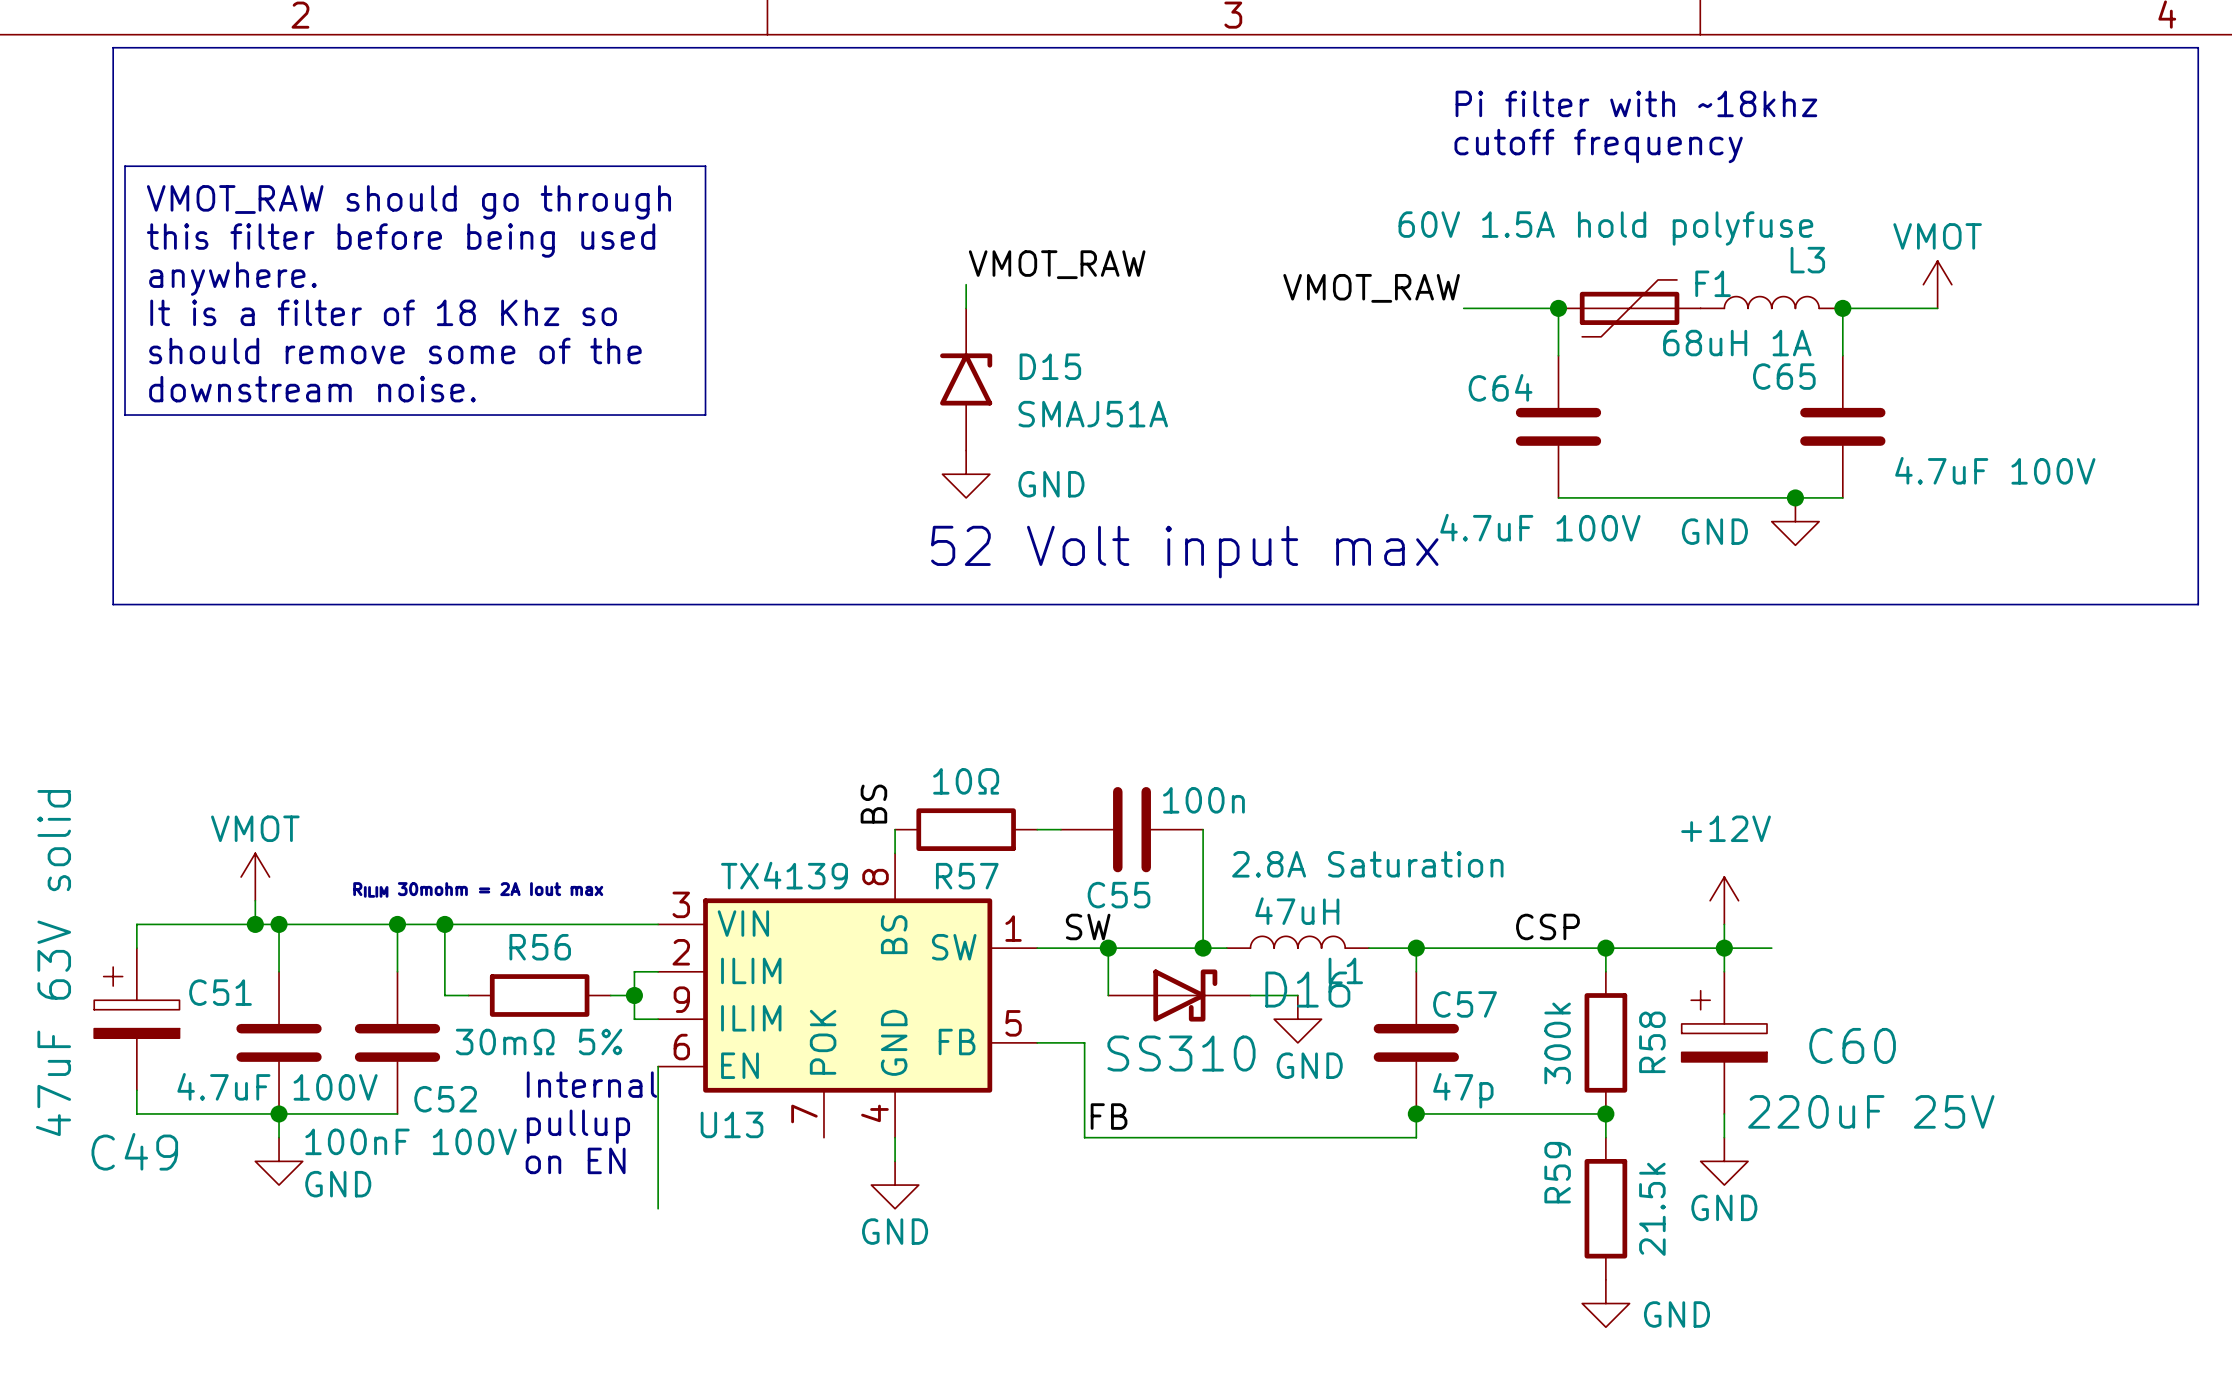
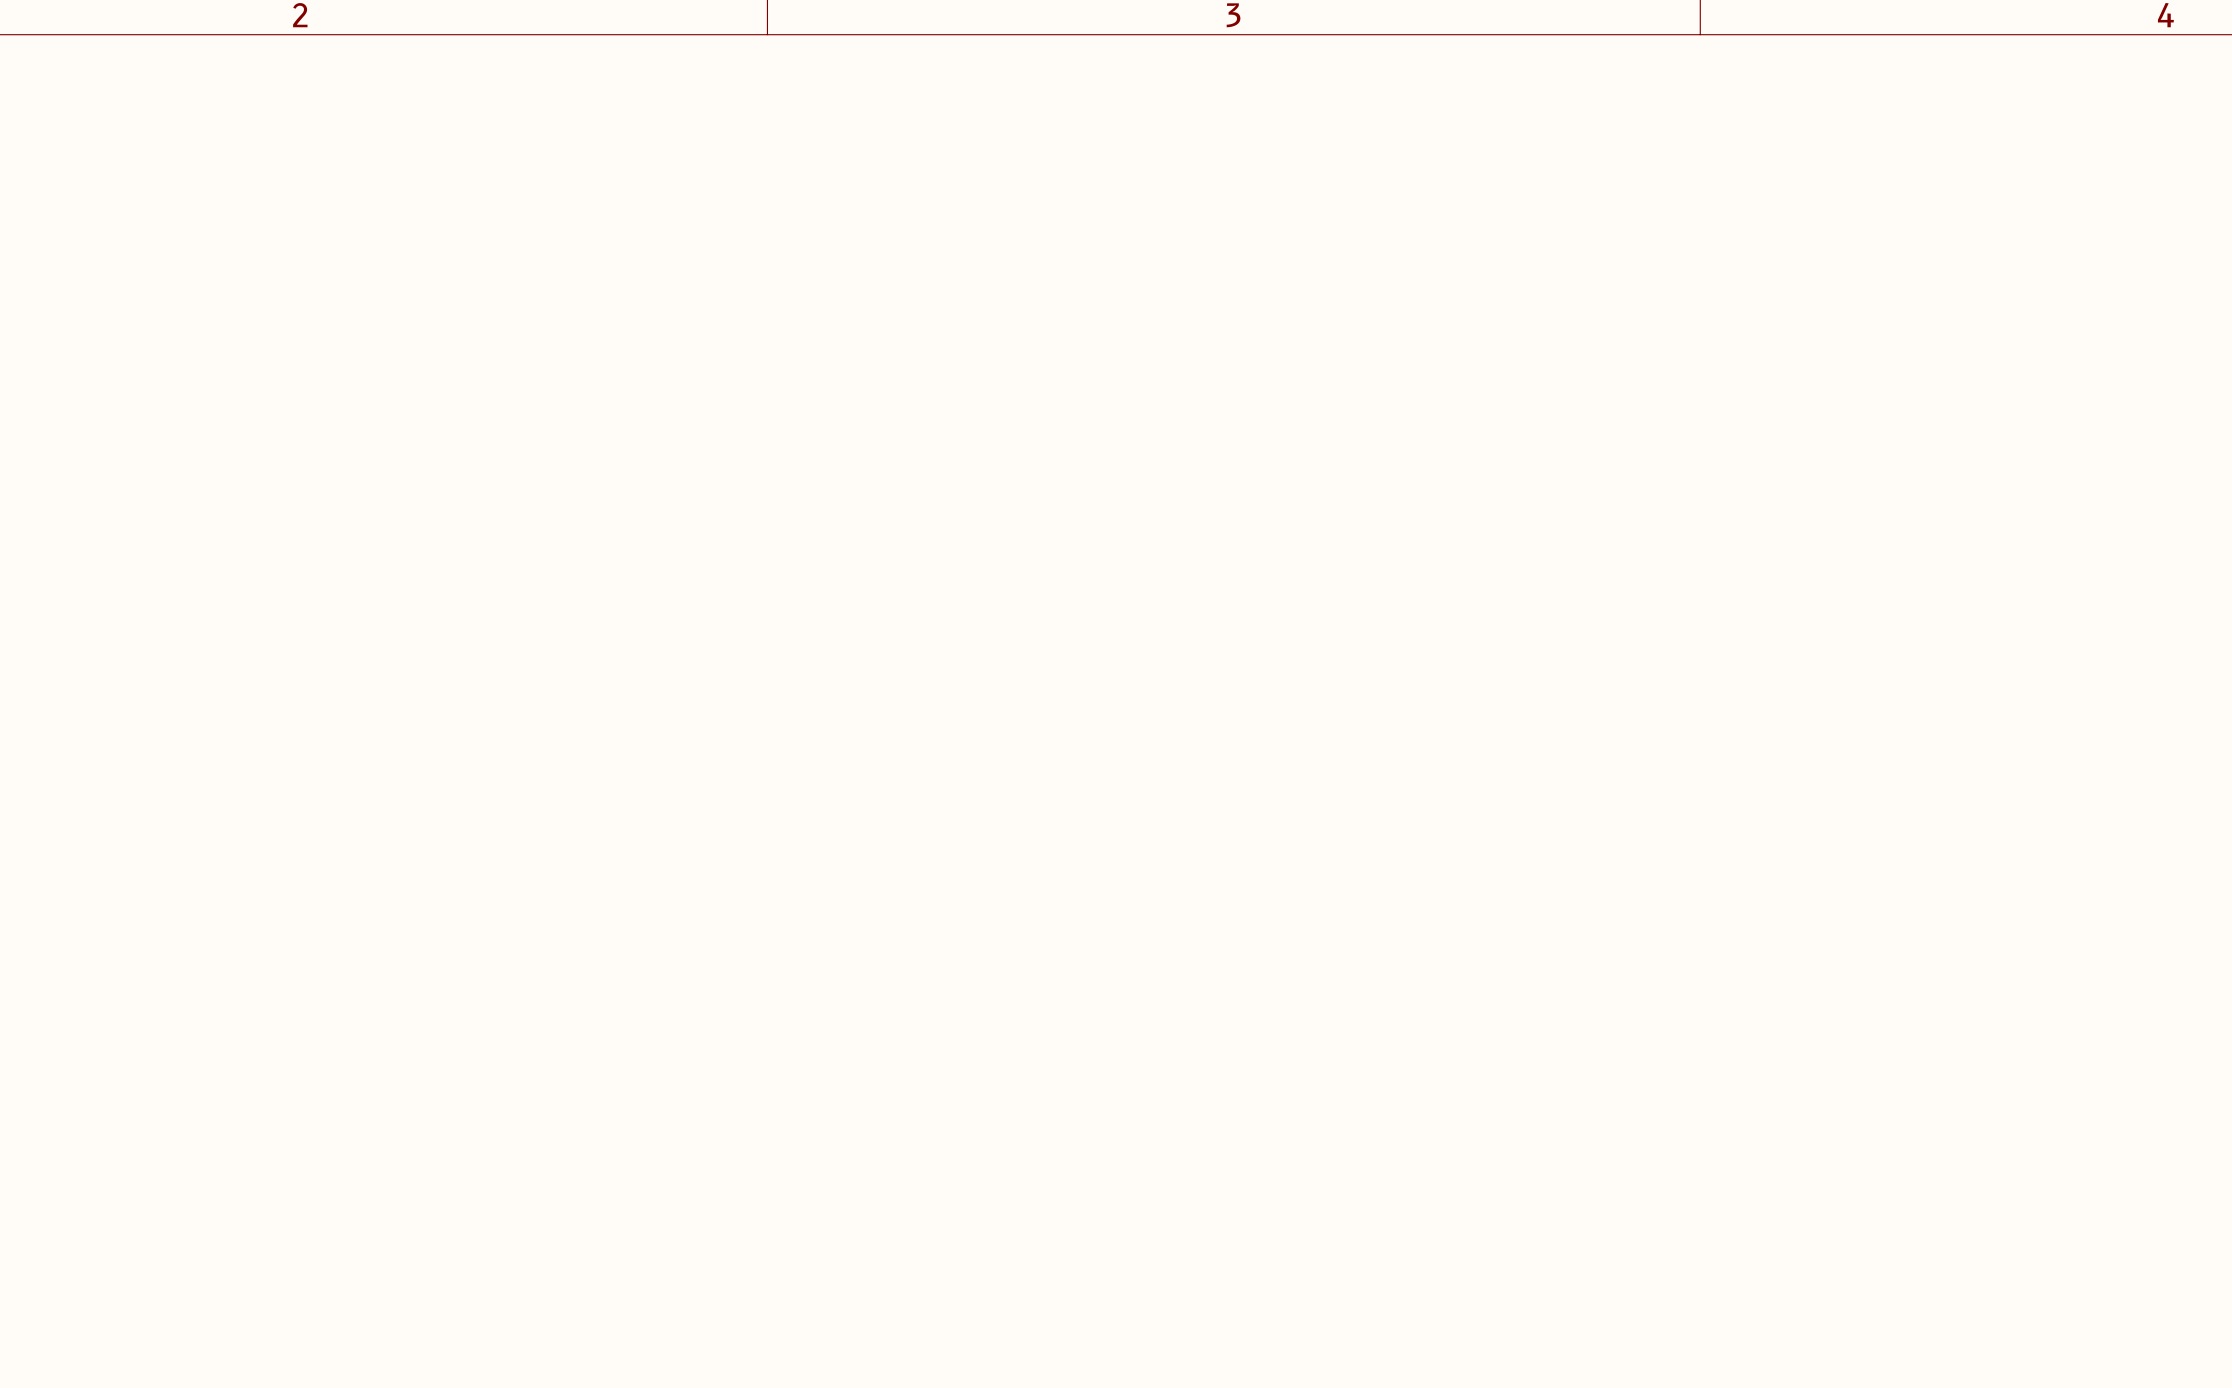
line: (113, 47) (2198, 47) (2198, 604) (113, 604) (113, 47) -> none
text: Pi filter with ~18khz (1636, 103) -> none
text: cutoff frequency (1598, 146) -> none
line: (125, 166) (705, 166) (705, 415) (125, 415) (125, 166) -> none
text: VMOT_RAW should go through (408, 202) -> none
text: this filter before being used (401, 240) -> none
label: VMOT_RAW (1057, 264) -> none
text: anywhere. (232, 278) -> none
wire: (966, 284) (966, 308) -> none
power symbol: VMOT (1937, 284) -> none
label: VMOT_RAW (1371, 288) -> none
L3: 68uH 1A (1771, 302) -> none
wire: (1463, 308) (1558, 308) (1558, 355) -> none
junction: (1558, 308) -> none
F1: 60V 1.5A hold polyfuse (1629, 308) -> none
junction: (1842, 308) -> none
wire: (1937, 308) (1842, 308) (1842, 355) -> none
text: It is a filter of 18 Khz so (383, 312) -> none
text: should remove some of the (395, 350) -> none
D15: SMAJ51A (966, 379) -> none
text: downstream noise. (312, 389) -> none
C64: 4.7uF 100V (1558, 426) -> none
C65: 4.7uF 100V (1842, 426) -> none
power symbol: GND (966, 474) -> none
wire: (1558, 497) (1842, 497) -> none
junction: (1795, 497) -> none
power symbol: GND (1795, 521) -> none
text: 52 Volt input max (1184, 552) -> none
label: BS (873, 804) -> none
wire: (895, 829) (895, 853) -> none
R57: 10Ω (966, 829) -> none
wire: (1037, 829) (1060, 829) -> none
C55: 100n (1132, 829) -> none
wire: (1203, 829) (1203, 948) -> none
power symbol: VMOT (255, 877) -> none
text: RILIM 30mohm = 2A Iout max (478, 889) -> none
wire: (255, 900) (255, 924) -> none
power symbol: +12V (1724, 900) -> none
junction: (255, 924) -> none
wire: (279, 924) (279, 971) -> none
junction: (279, 924) -> none
wire: (397, 924) (397, 971) -> none
junction: (397, 924) -> none
wire: (444, 924) (444, 995) (468, 995) -> none
junction: (444, 924) -> none
wire: (658, 924) (136, 924) (136, 948) -> none
wire: (1724, 924) (1724, 971) -> none
label: SW (1088, 926) -> none
label: CSP (1547, 926) -> none
L1: 47uH (1297, 942) -> none
wire: (1037, 948) (1226, 948) -> none
wire: (1108, 948) (1108, 995) -> none
junction: (1108, 948) -> none
junction: (1203, 948) -> none
wire: (1368, 948) (1771, 948) -> none
wire: (1416, 948) (1416, 971) -> none
junction: (1416, 948) -> none
wire: (1605, 948) (1605, 971) -> none
junction: (1605, 948) -> none
junction: (1724, 948) -> none
wire: (658, 971) (634, 971) (634, 1019) (658, 1019) -> none
R56: 30mΩ 5% (539, 995) -> none
wire: (610, 995) (634, 995) -> none
junction: (634, 995) -> none
U13: TX4139 (847, 995) -> none
D16: SS310 (1179, 995) -> none
wire: (1250, 995) (1297, 995) -> none
C49: 47uF 63V solid (136, 1019) -> none
power symbol: GND (1297, 1019) -> none
C51: 4.7uF 100V (279, 1042) -> none
C52: 100nF 100V (397, 1042) -> none
wire: (1037, 1042) (1084, 1042) (1084, 1137) (1416, 1137) (1416, 1113) (1605, 1113) (1605, 1137) -> none
C57: 47p (1416, 1042) -> none
R58: 300k (1605, 1042) -> none
C60: 220uF 25V (1724, 1042) -> none
wire: (658, 1066) (658, 1208) -> none
text: Internal (591, 1084) -> none
wire: (136, 1090) (136, 1113) (397, 1113) -> none
wire: (279, 1113) (279, 1137) -> none
junction: (279, 1113) -> none
junction: (1416, 1113) -> none
junction: (1605, 1113) -> none
wire: (1724, 1113) (1724, 1137) -> none
label: FB (1109, 1116) -> none
text: pullup (578, 1126) -> none
wire: (895, 1137) (895, 1161) -> none
text: on EN (575, 1160) -> none
power symbol: GND (279, 1161) -> none
power symbol: GND (1724, 1161) -> none
power symbol: GND (895, 1185) -> none
R59: 21.5k (1605, 1208) -> none
power symbol: GND (1605, 1303) -> none

